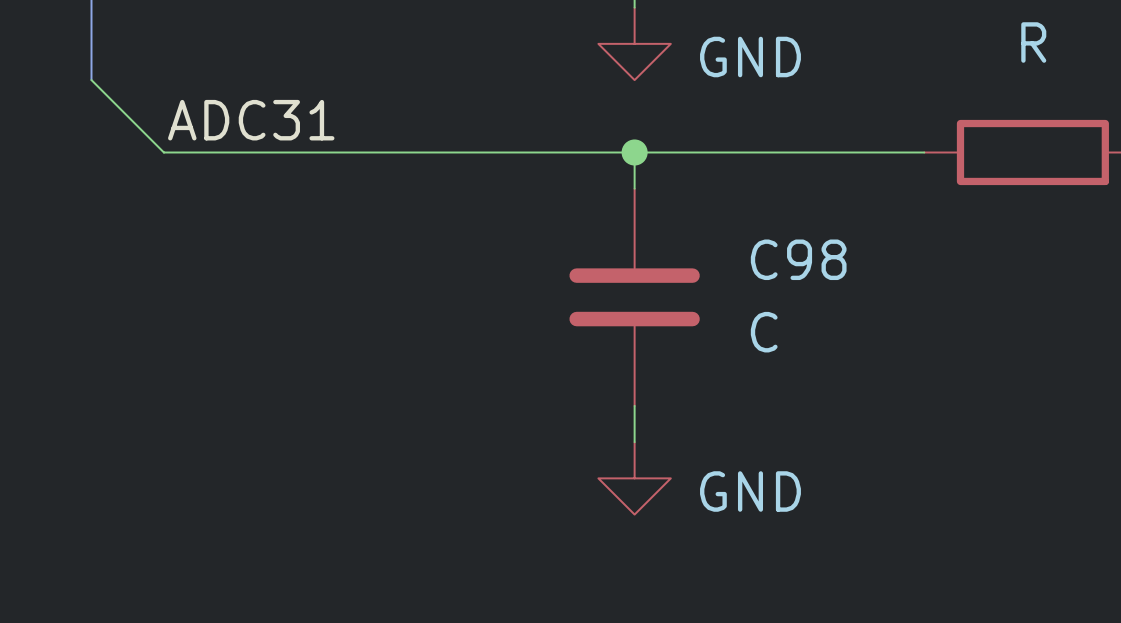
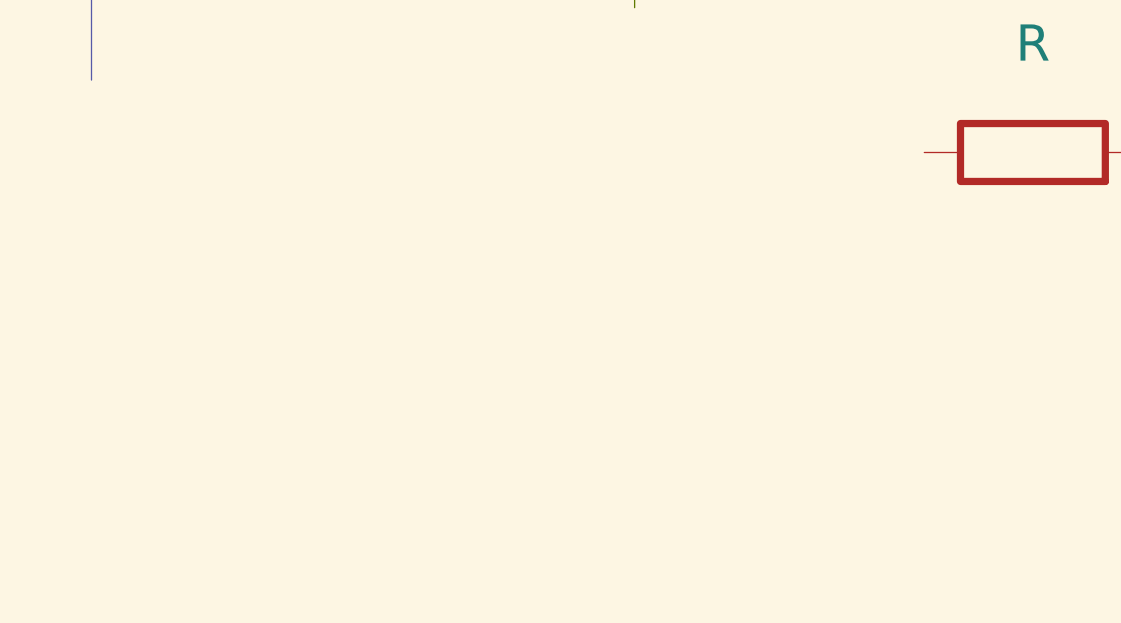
power symbol: GND (634, 43) -> none
wire: (91, 80) (163, 152) (924, 152) -> none
label: ADC31 (251, 120) -> none
wire: (634, 152) (634, 188) -> none
junction: (634, 152) -> none
C98: C (634, 297) -> none
wire: (634, 405) (634, 442) -> none
power symbol: GND (634, 478) -> none

